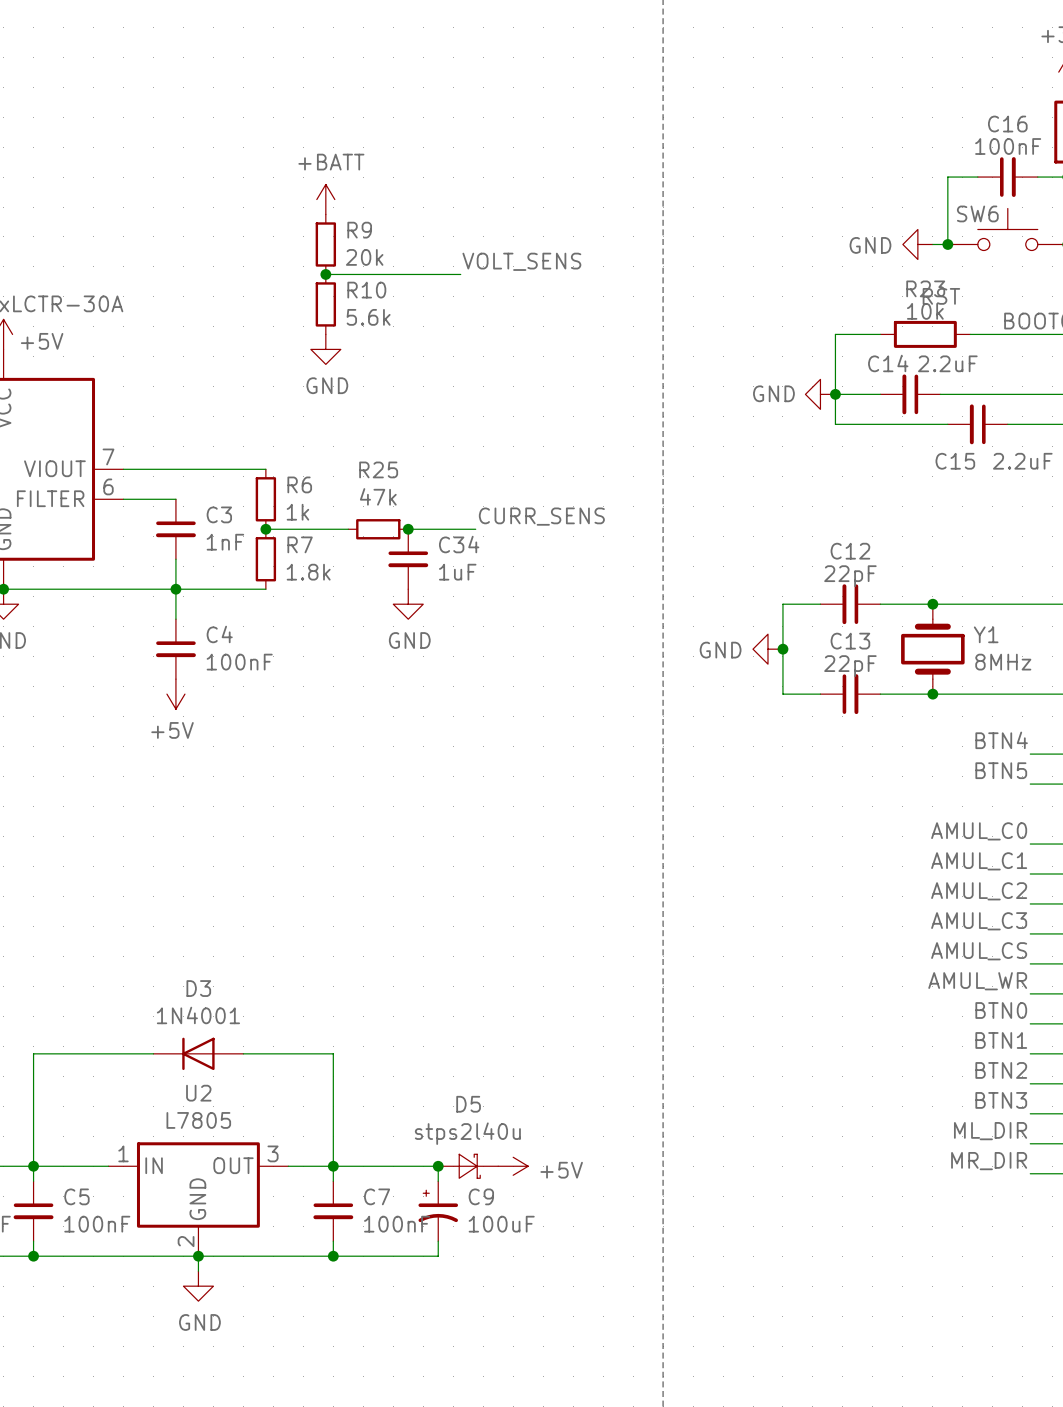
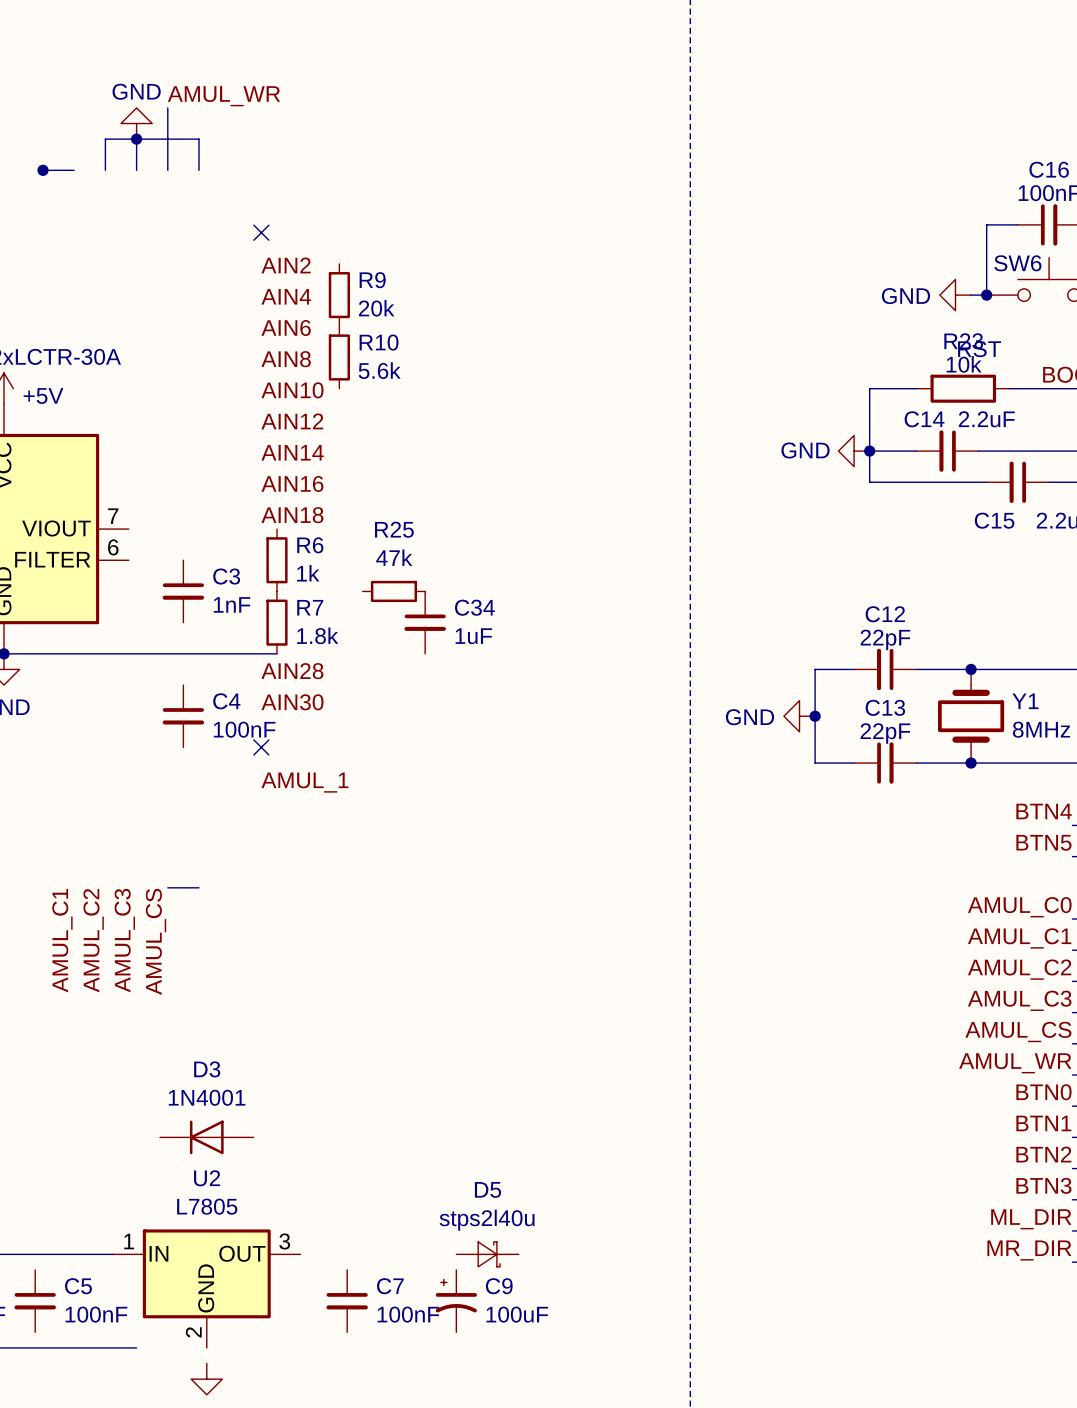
label: none -> AMUL_WR (223, 96)
wire: none -> (167, 107) (167, 170)
power symbol: none -> GND (136, 123)
wire: none -> (136, 139) (136, 170)
junction: none -> (136, 139)
wire: none -> (43, 170) (74, 170)
junction: none -> (43, 170)
wire: none -> (105, 170) (105, 139) (198, 139) (198, 170)
no-connect mark: none -> (261, 232)
power symbol: +BATT (325, 199) -> none
label: none -> AIN2 (286, 265)
label: none -> AIN4 (286, 296)
label: VOLT_SENS (521, 261) -> none
wire: (325, 274) (460, 274) -> none
junction: (325, 274) -> none
label: none -> AIN6 (286, 327)
label: none -> AIN8 (286, 359)
label: none -> AIN10 (292, 390)
power symbol: GND (325, 349) -> none
label: none -> AIN12 (292, 421)
label: none -> AIN14 (292, 452)
label: none -> AIN16 (292, 483)
label: none -> AIN18 (292, 515)
wire: (123, 469) (265, 469) -> none
wire: (123, 499) (175, 499) -> none
label: CURR_SENS (541, 516) -> none
wire: (265, 529) (348, 529) -> none
junction: (265, 529) -> none
wire: (408, 529) (475, 529) -> none
junction: (408, 529) -> none
wire: (175, 559) (175, 619) -> none
junction: (175, 589) -> none
power symbol: GND (408, 604) -> none
label: none -> AIN28 (292, 671)
label: none -> AIN30 (292, 702)
no-connect mark: none -> (261, 747)
power symbol: +5V (175, 694) -> none
label: none -> AMUL_1 (304, 782)
wire: none -> (167, 887) (198, 887)
label: none -> AMUL_C1 (62, 940)
label: none -> AMUL_C2 (93, 940)
label: none -> AMUL_C3 (124, 940)
label: none -> AMUL_CS (156, 941)
wire: (153, 1053) (33, 1053) (33, 1181) -> none
wire: (243, 1053) (333, 1053) (333, 1181) -> none
junction: (33, 1166) -> none
wire: (288, 1166) (438, 1166) (438, 1181) -> none
junction: (333, 1166) -> none
junction: (438, 1166) -> none
power symbol: +5V (513, 1166) -> none
wire: (33, 1241) (33, 1256) -> none
wire: (333, 1241) (333, 1256) -> none
wire: (438, 1241) (438, 1256) (130, 1256) -> none
junction: (33, 1256) -> none
wire: (198, 1256) (198, 1271) -> none
junction: (198, 1256) -> none
junction: (333, 1256) -> none

